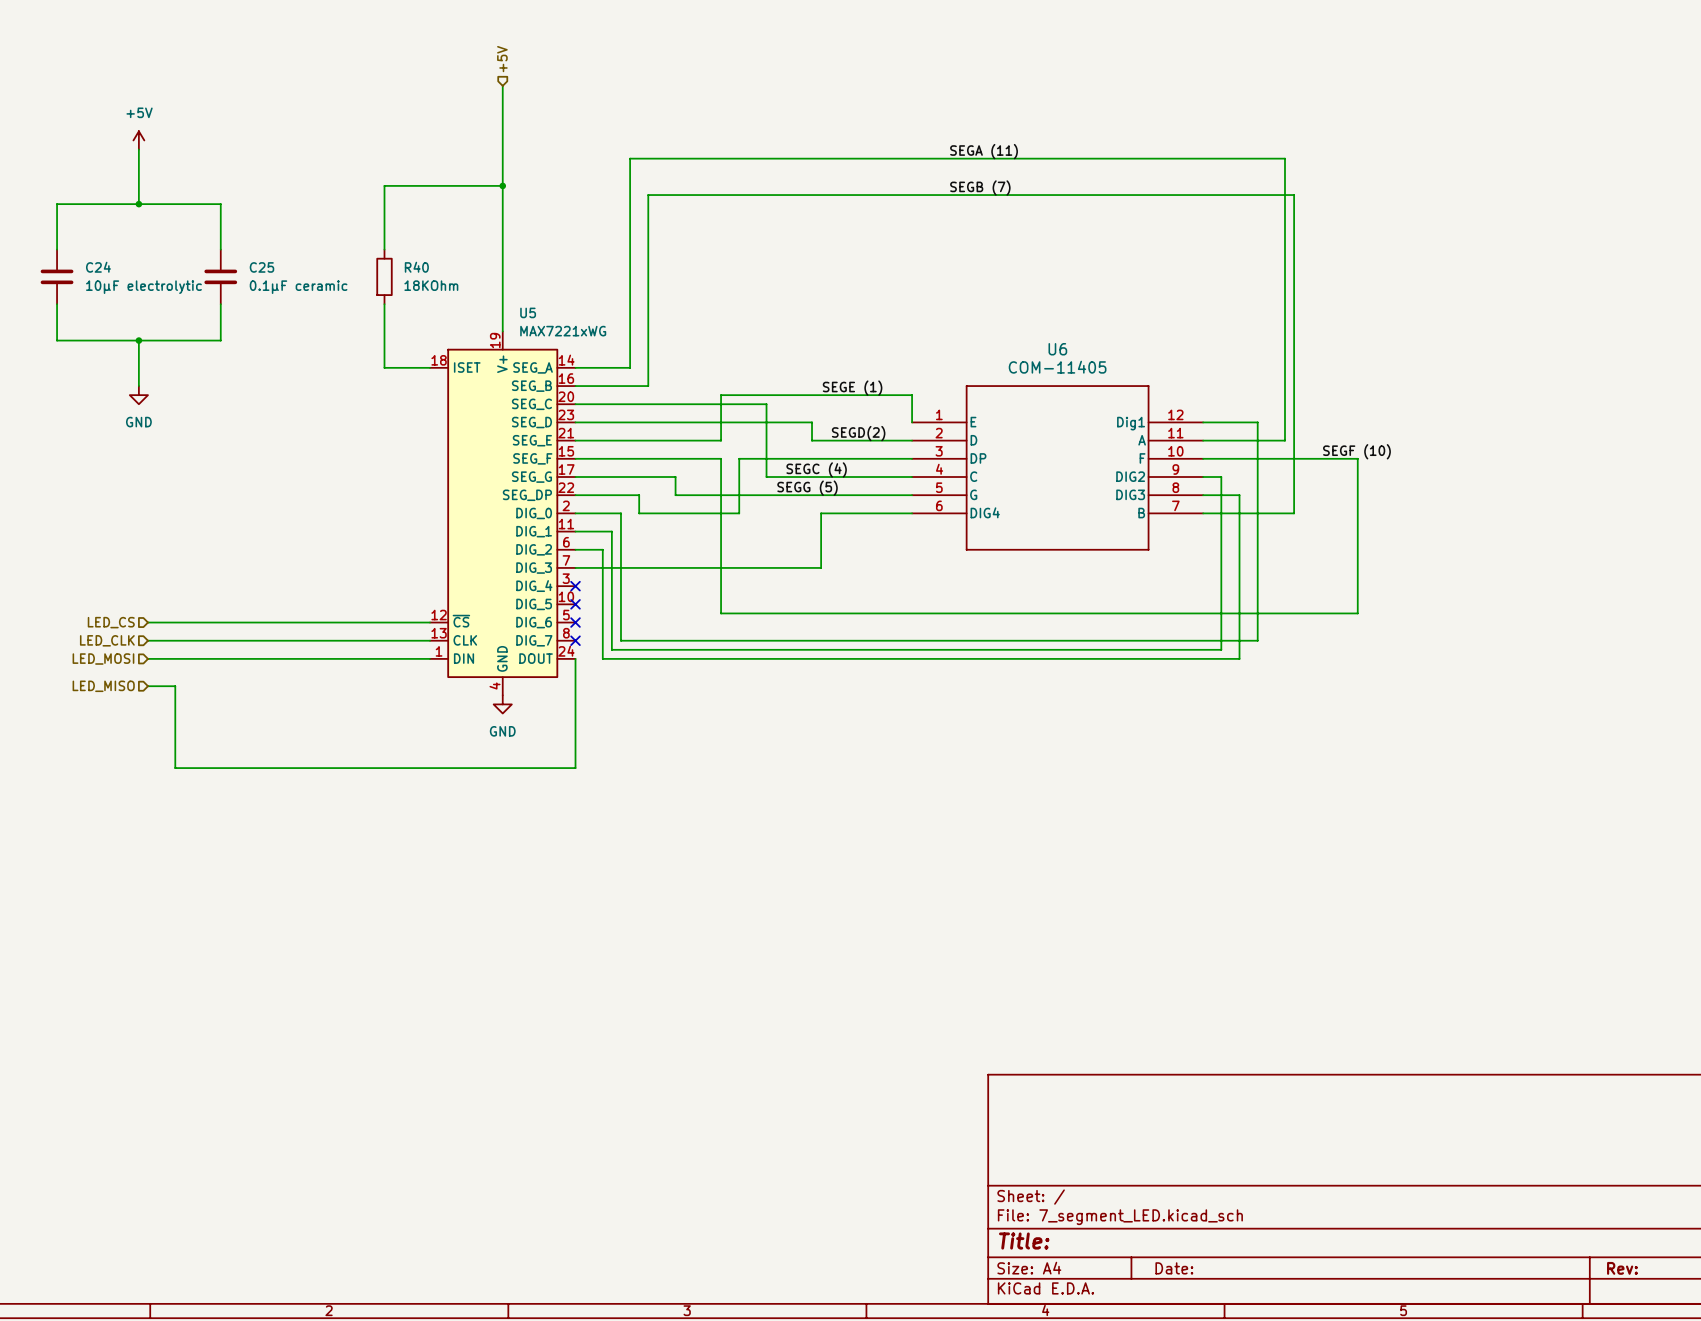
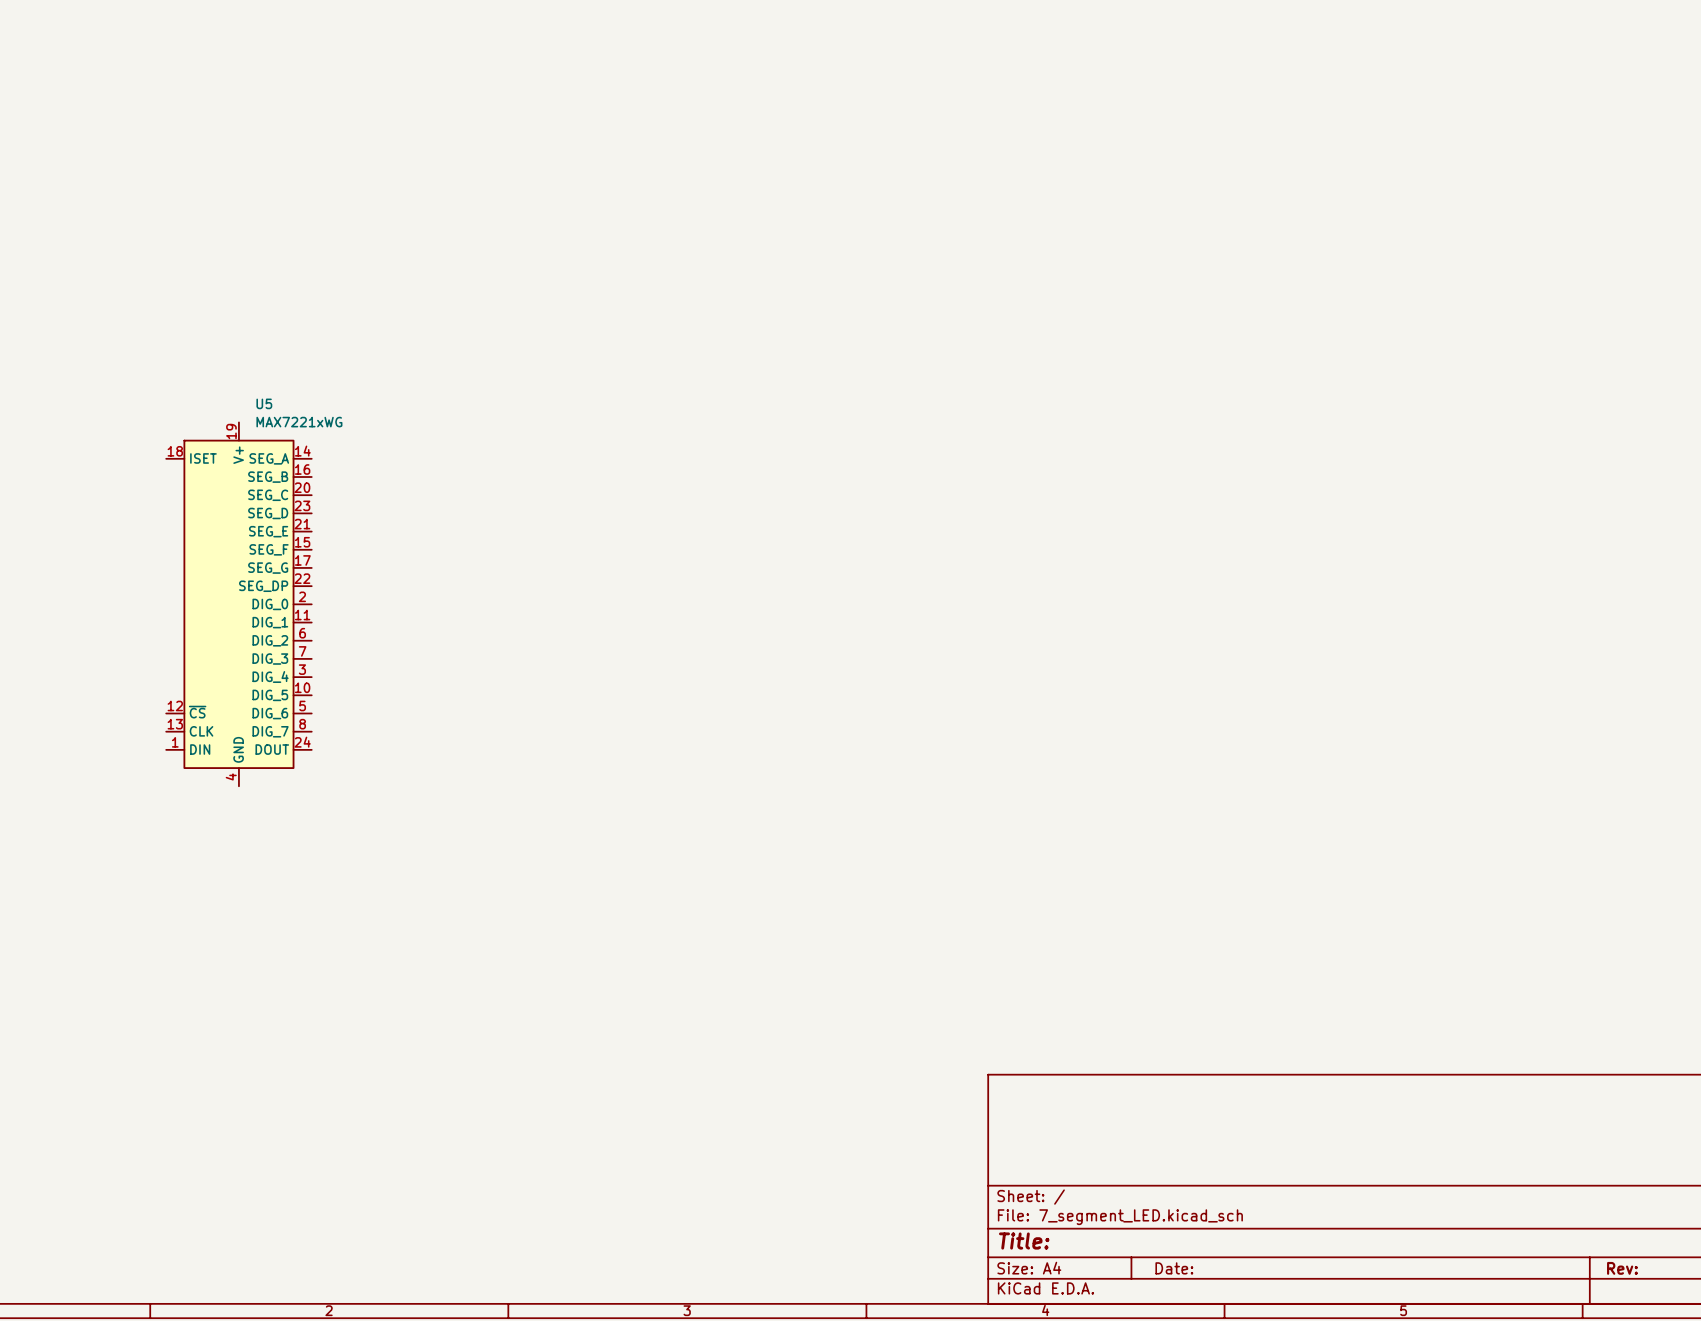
hierarchical label: +5V (502, 59) -> none
wire: (502, 85) (502, 331) -> none
power symbol: +5V (138, 140) -> none
wire: (138, 149) (138, 204) -> none
label: SEGA (11) (984, 151) -> none
wire: (502, 185) (384, 185) (384, 249) -> none
junction: (502, 185) -> none
label: SEGB (7) (980, 187) -> none
junction: (138, 204) -> none
wire: (57, 249) (57, 204) (220, 204) (220, 249) -> none
C24: 10µF electrolytic (57, 276) -> none
C25: 0.1µF ceramic (220, 276) -> none
R40: 18KOhm (384, 276) -> none
wire: (57, 304) (57, 340) (220, 340) (220, 304) -> none
wire: (384, 304) (384, 367) (429, 367) -> none
wire: (138, 340) (138, 386) -> none
junction: (138, 340) -> none
wire: (575, 367) (630, 367) (630, 158) (1284, 158) (1284, 440) (1203, 440) -> none
wire: (575, 386) (648, 386) (648, 195) (1294, 195) (1294, 513) (1203, 513) -> none
label: SEGE (1) (852, 388) -> none
power symbol: GND (138, 395) -> none
wire: (575, 404) (766, 404) (766, 477) (912, 477) -> none
wire: (575, 422) (812, 422) (812, 440) (912, 440) -> none
wire: (912, 422) (912, 395) (721, 395) (721, 440) (575, 440) -> none
wire: (1203, 422) (1257, 422) (1257, 640) (620, 640) (620, 513) (575, 513) -> none
label: SEGD(2) (858, 433) -> none
label: SEGF (10) (1356, 451) -> none
wire: (575, 458) (721, 458) (721, 613) (1357, 613) (1357, 458) (1203, 458) -> none
wire: (912, 458) (739, 458) (739, 513) (639, 513) (639, 495) (575, 495) -> none
U6: COM-11405 (1057, 467) -> none
label: SEGC (4) (816, 469) -> none
wire: (575, 477) (675, 477) (675, 495) (912, 495) -> none
wire: (1203, 477) (1221, 477) (1221, 649) (611, 649) (611, 531) (575, 531) -> none
label: SEGG (5) (807, 488) -> none
wire: (1203, 495) (1239, 495) (1239, 658) (602, 658) (602, 549) (575, 549) -> none
U5 position: (502, 513) -> (238, 604)
wire: (912, 513) (821, 513) (821, 567) (575, 567) -> none
no-connect mark: (575, 586) -> none
no-connect mark: (575, 604) -> none
hierarchical label: LED_CS (111, 622) -> none
wire: (148, 622) (429, 622) -> none
no-connect mark: (575, 622) -> none
hierarchical label: LED_CLK (107, 640) -> none
wire: (148, 640) (429, 640) -> none
no-connect mark: (575, 640) -> none
wire: (148, 658) (429, 658) -> none
wire: (575, 658) (575, 768) (175, 768) (175, 686) (148, 686) -> none
hierarchical label: LED_MOSI (103, 659) -> none
hierarchical label: LED_MISO (103, 686) -> none
power symbol: GND (502, 704) -> none

